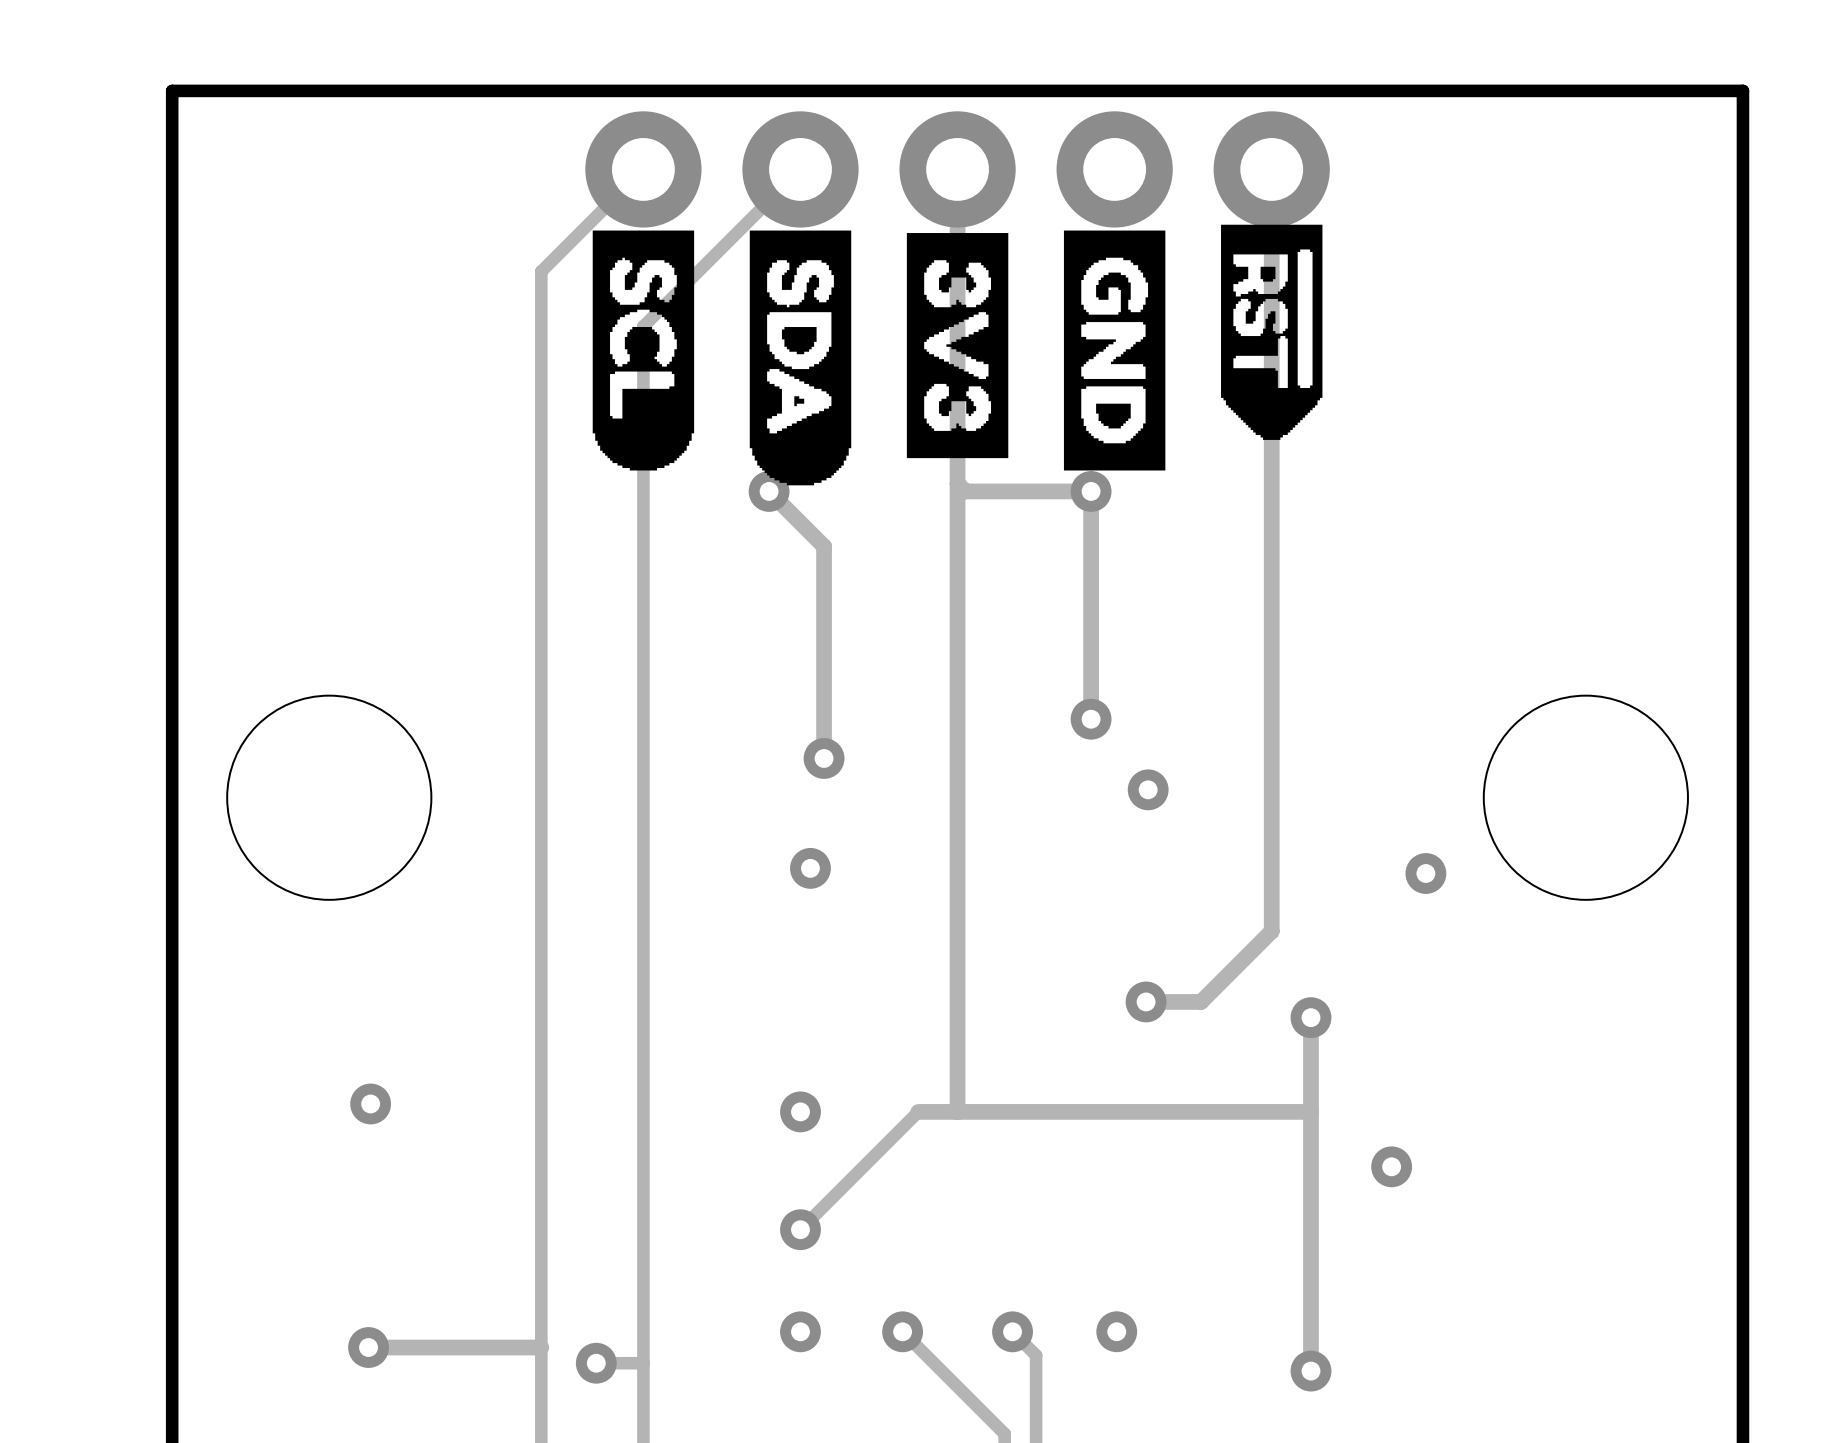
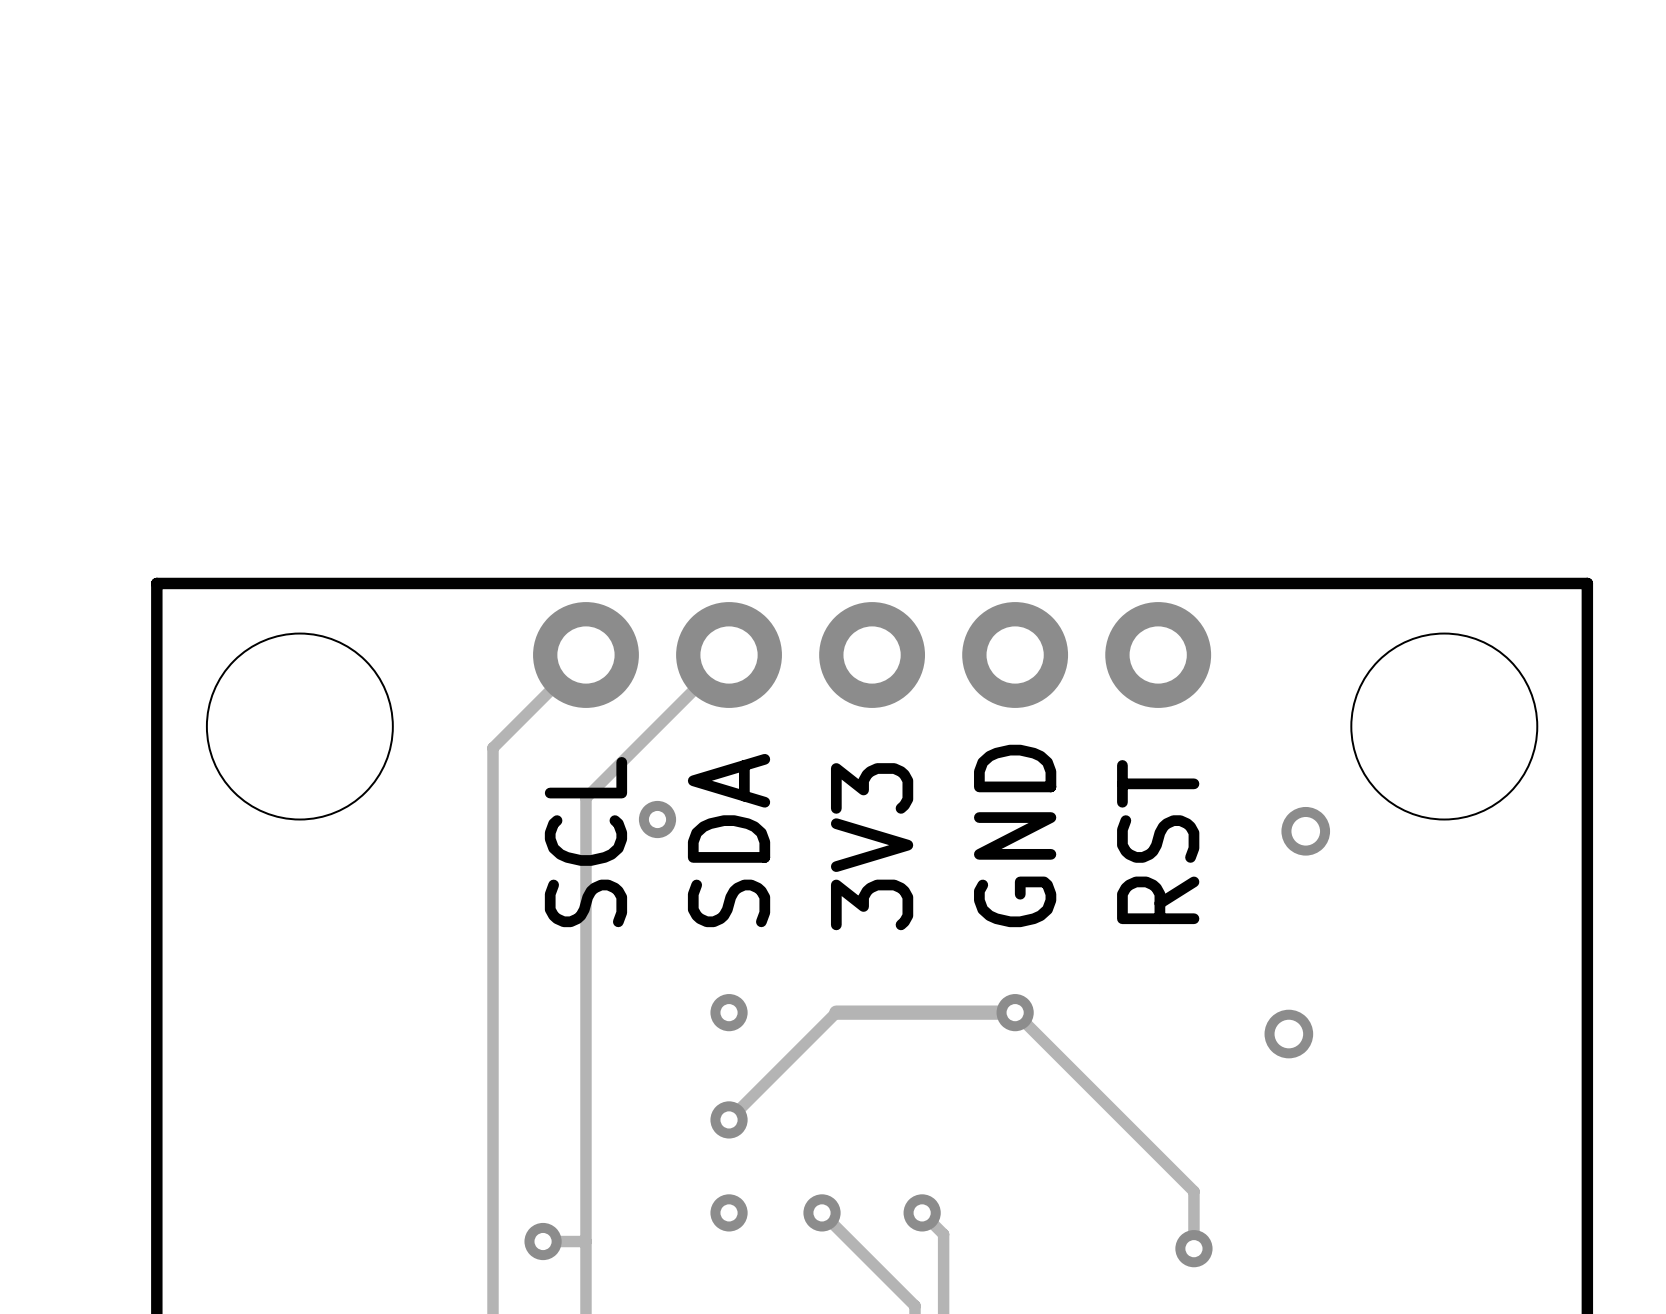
track: (643, 169) (541, 271) (541, 821) -> (585, 655) (492, 747)
track: (800, 169) (643, 326) (643, 876) -> (729, 655) (585, 798)
part position: (879, 169) -> (800, 655)
track: (957, 169) (957, 1111) -> none
track: (1271, 169) (1271, 931) (1201, 1001) (1146, 1001) -> none
part position: (1271, 169) -> (1158, 655)
drawing: [592, 224, 1323, 486] -> none
track: (957, 483) (965, 491) (1091, 491) (1091, 719) -> none
track: (769, 491) (824, 546) (824, 758) -> none
via: (769, 491) -> none
via: (1091, 491) -> none
board edge: (1742, 640) (1742, 90) (172, 90) (172, 640) -> (1587, 583) (156, 583)
via: (1091, 719) -> none
via: (824, 758) -> none
via: (1148, 789) -> none
via: (810, 868) -> none
via position: (1425, 873) -> (1305, 831)
via: none -> (657, 819)
text: none -> GND (1015, 835)
text: none -> SDA (729, 840)
text: none -> SCL (585, 842)
text: none -> RST (1158, 842)
text: none -> 3V3 (872, 846)
via: (1146, 1001) -> none
track: (1311, 1017) (1311, 1371) -> none
via: (1311, 1017) -> none
via: (370, 1103) -> none
via: none -> (1015, 1012)
track: (1311, 1111) (1114, 1111) -> (1193, 1191) (1015, 1012)
via position: (1391, 1166) -> (1288, 1034)
via: (1116, 1331) -> none
via: (368, 1347) -> none
track: (541, 1347) (368, 1347) -> none

